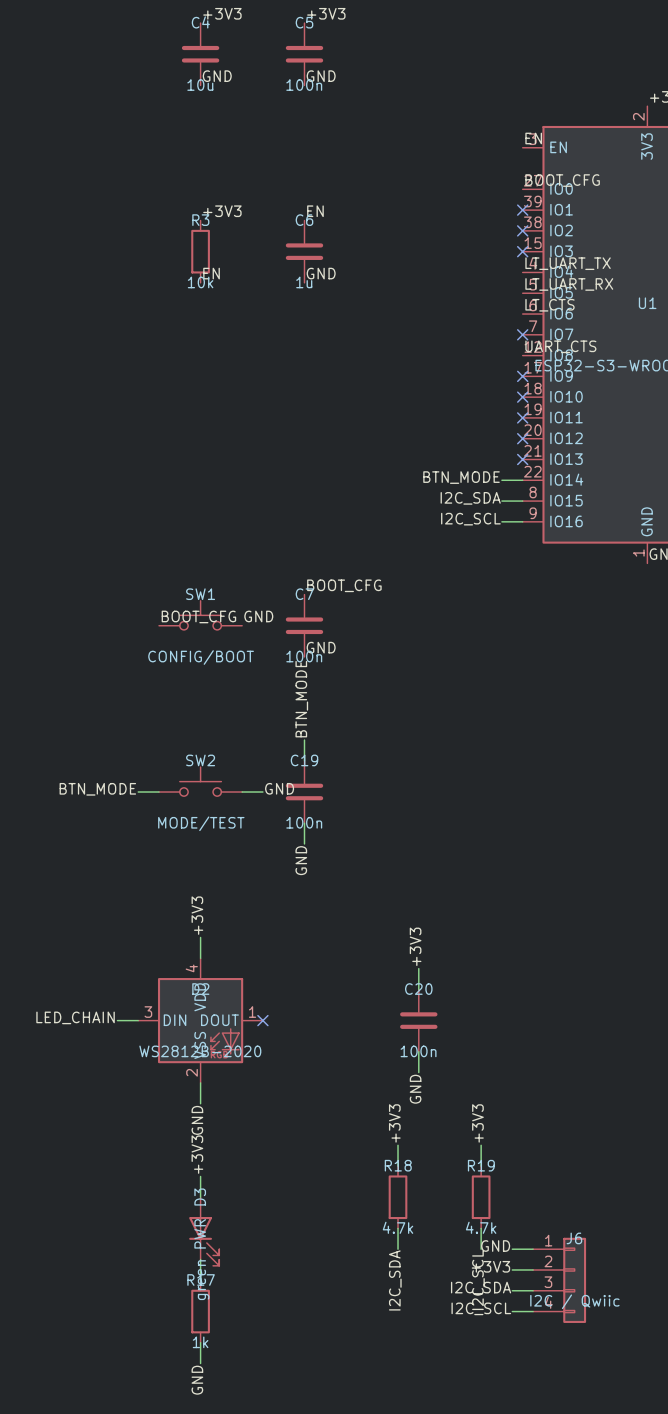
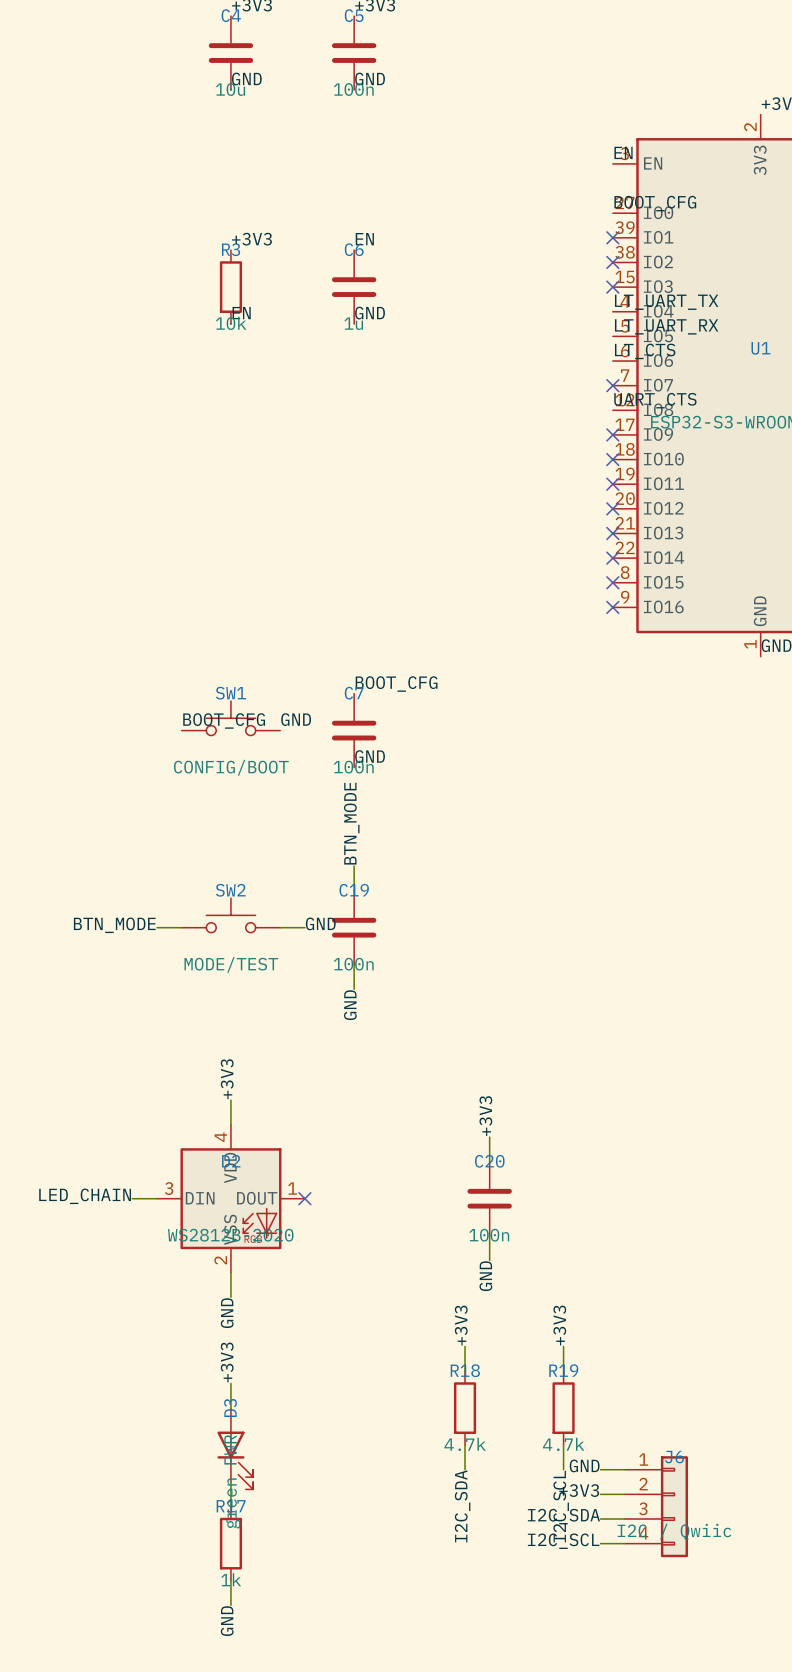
label: BTN_MODE (461, 477) -> none
wire: (501, 480) (522, 480) -> none
no-connect mark: none -> (612, 558)
label: I2C_SDA (470, 498) -> none
wire: (501, 501) (522, 501) -> none
no-connect mark: none -> (612, 582)
label: I2C_SCL (470, 519) -> none
wire: (501, 521) (522, 521) -> none
no-connect mark: none -> (612, 607)

